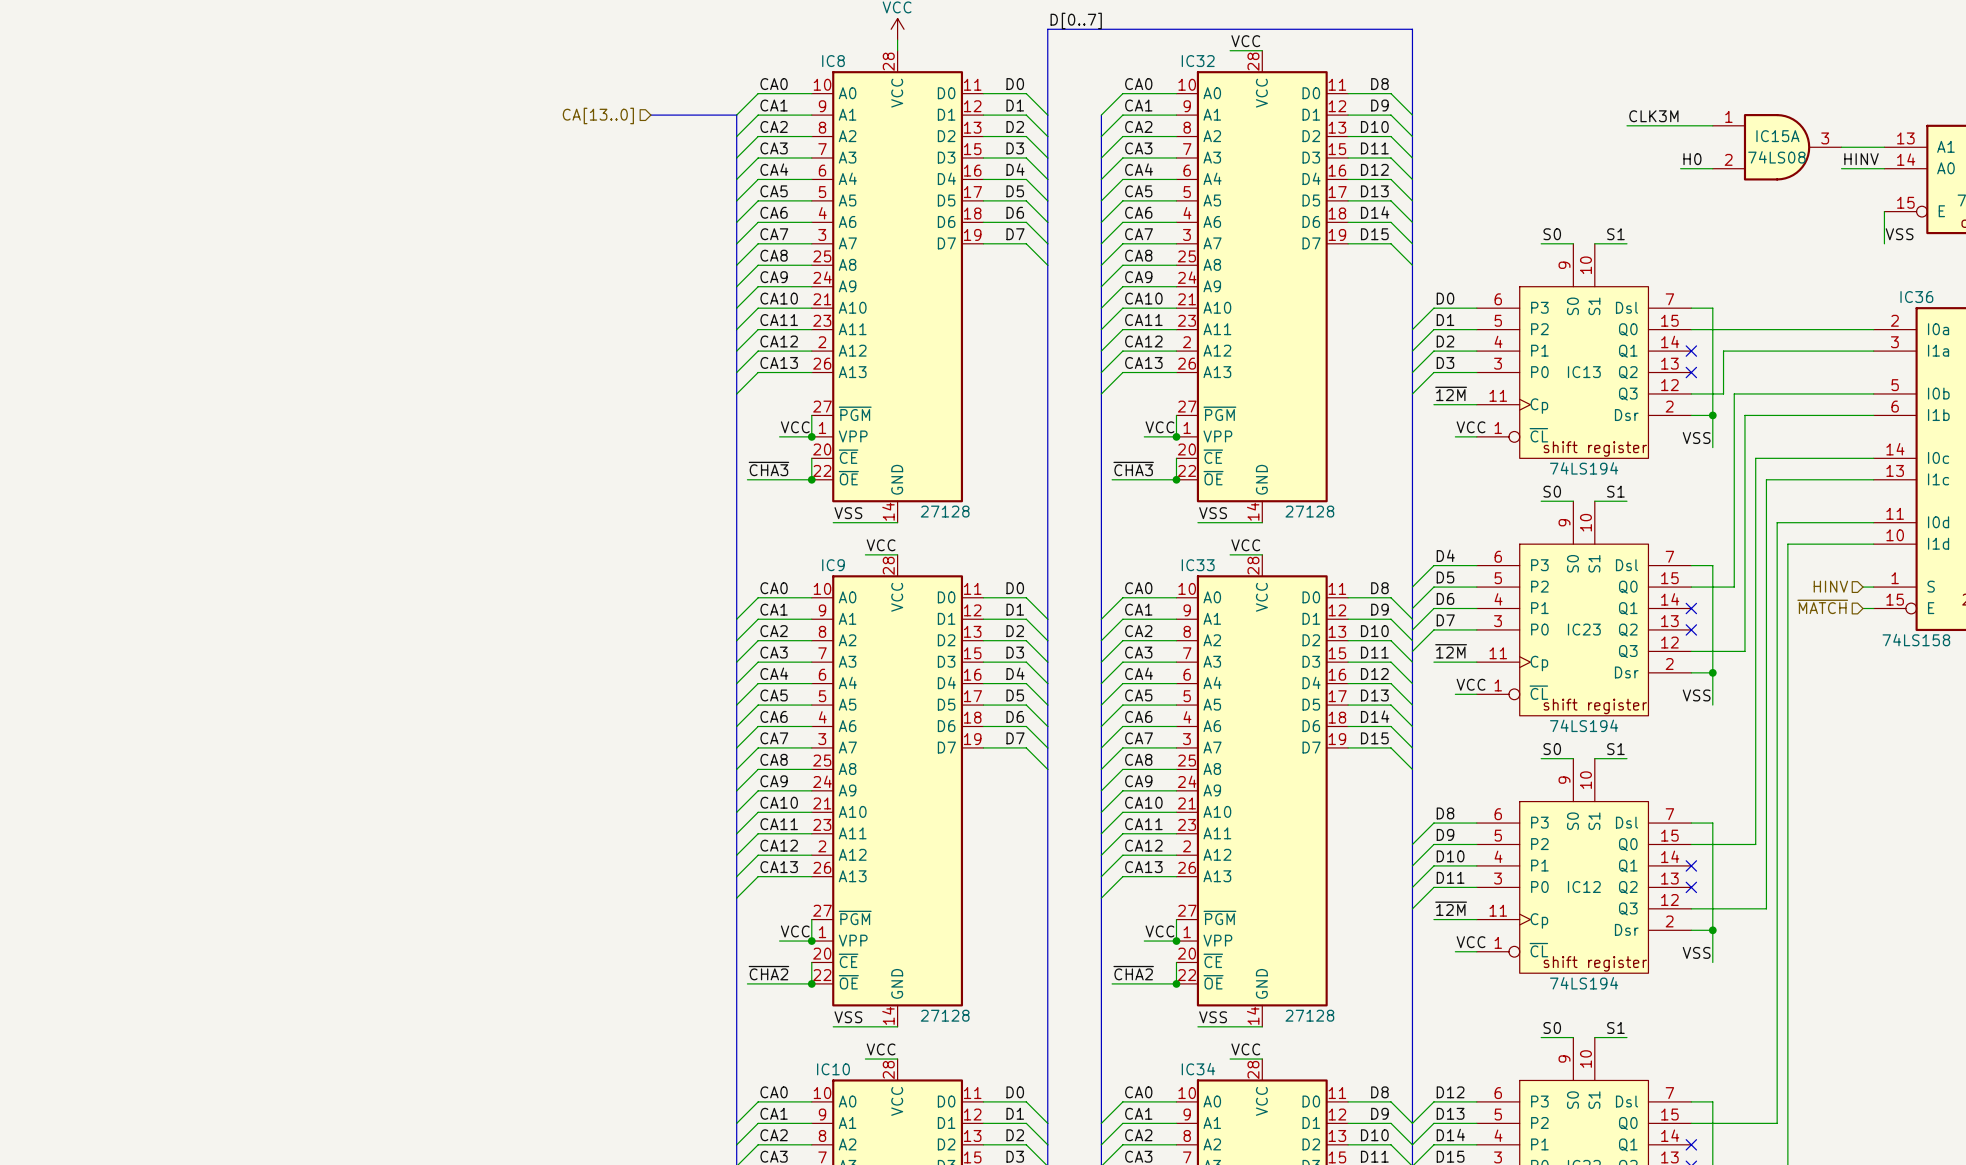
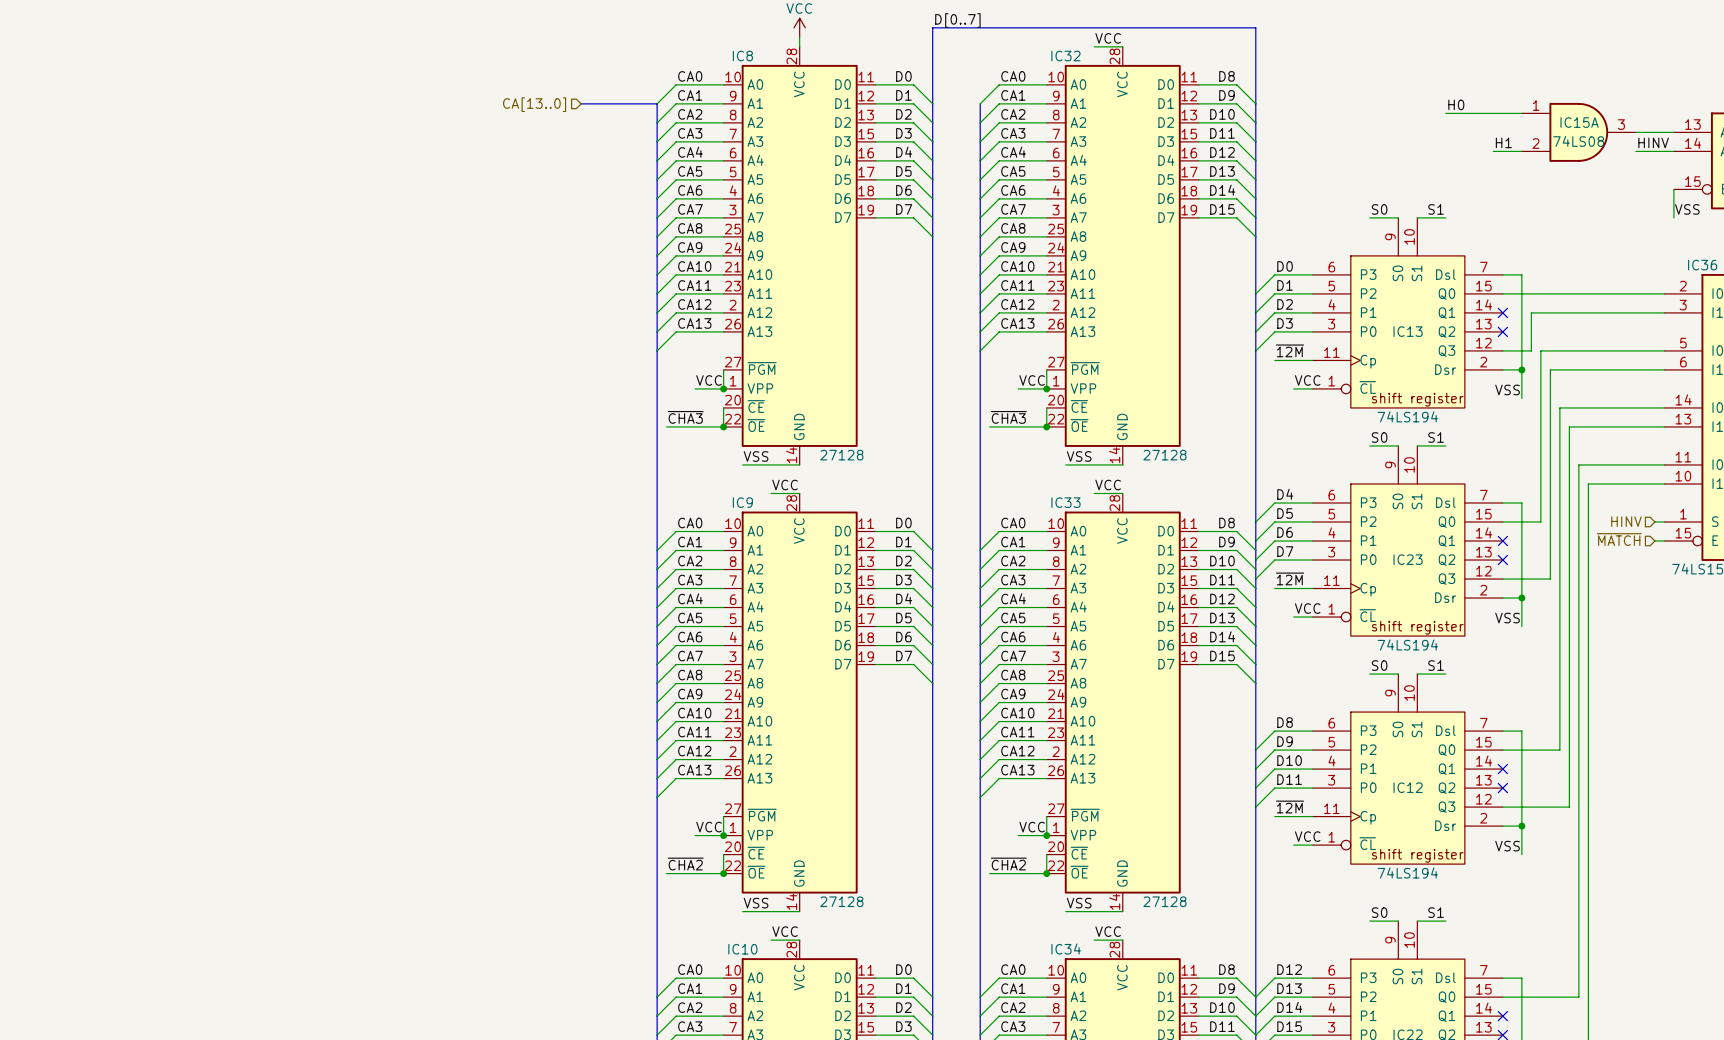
label: CLK3M (1653, 116) -> H0 (1456, 104)
label: H0 (1692, 159) -> H1 (1503, 142)

